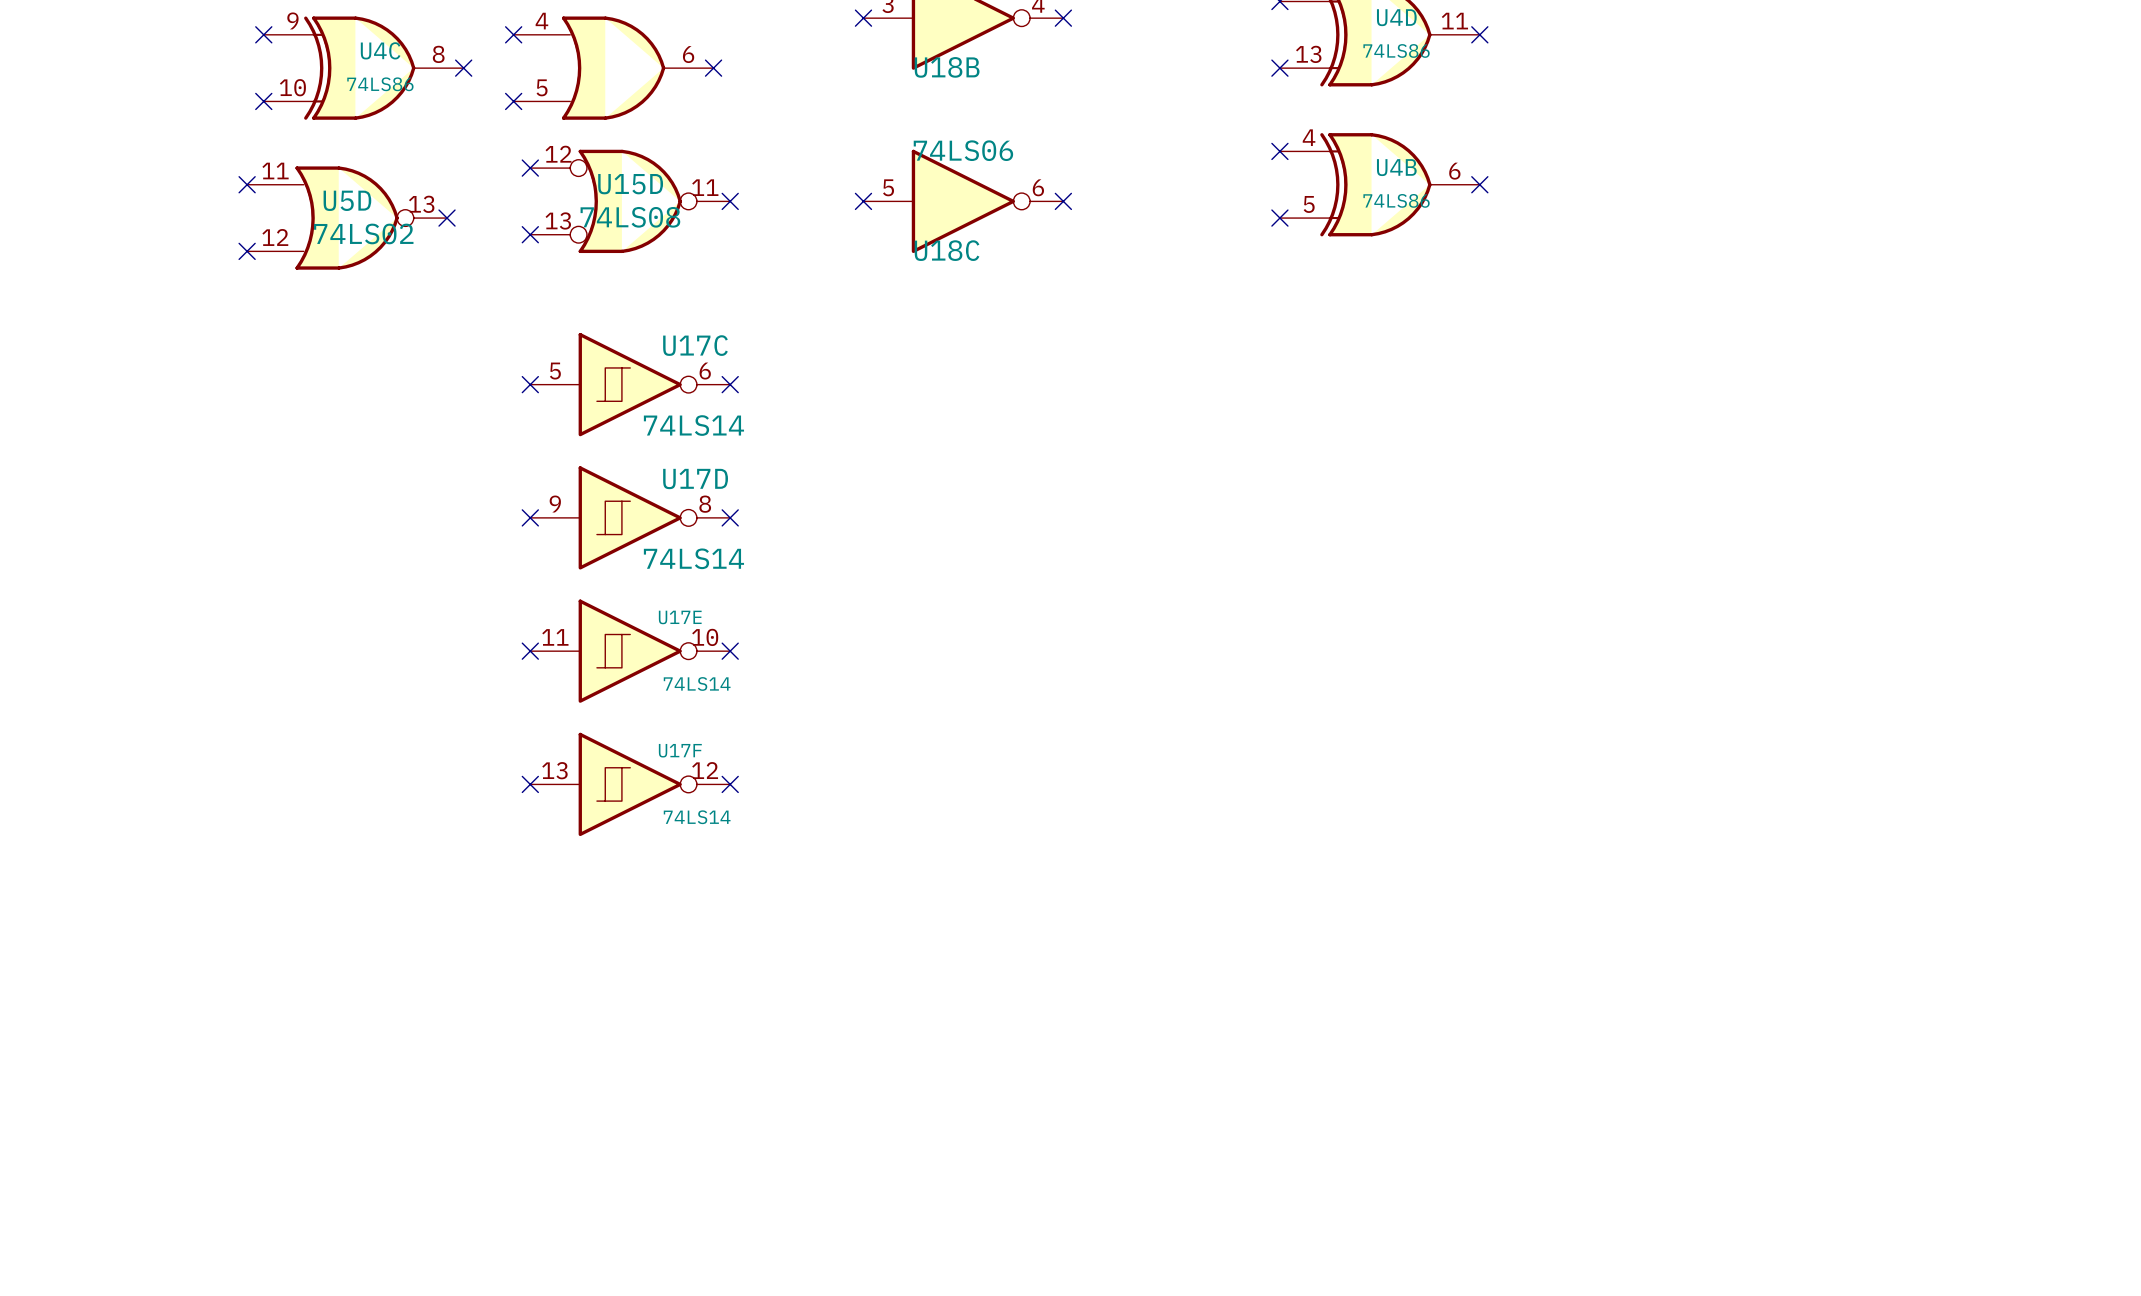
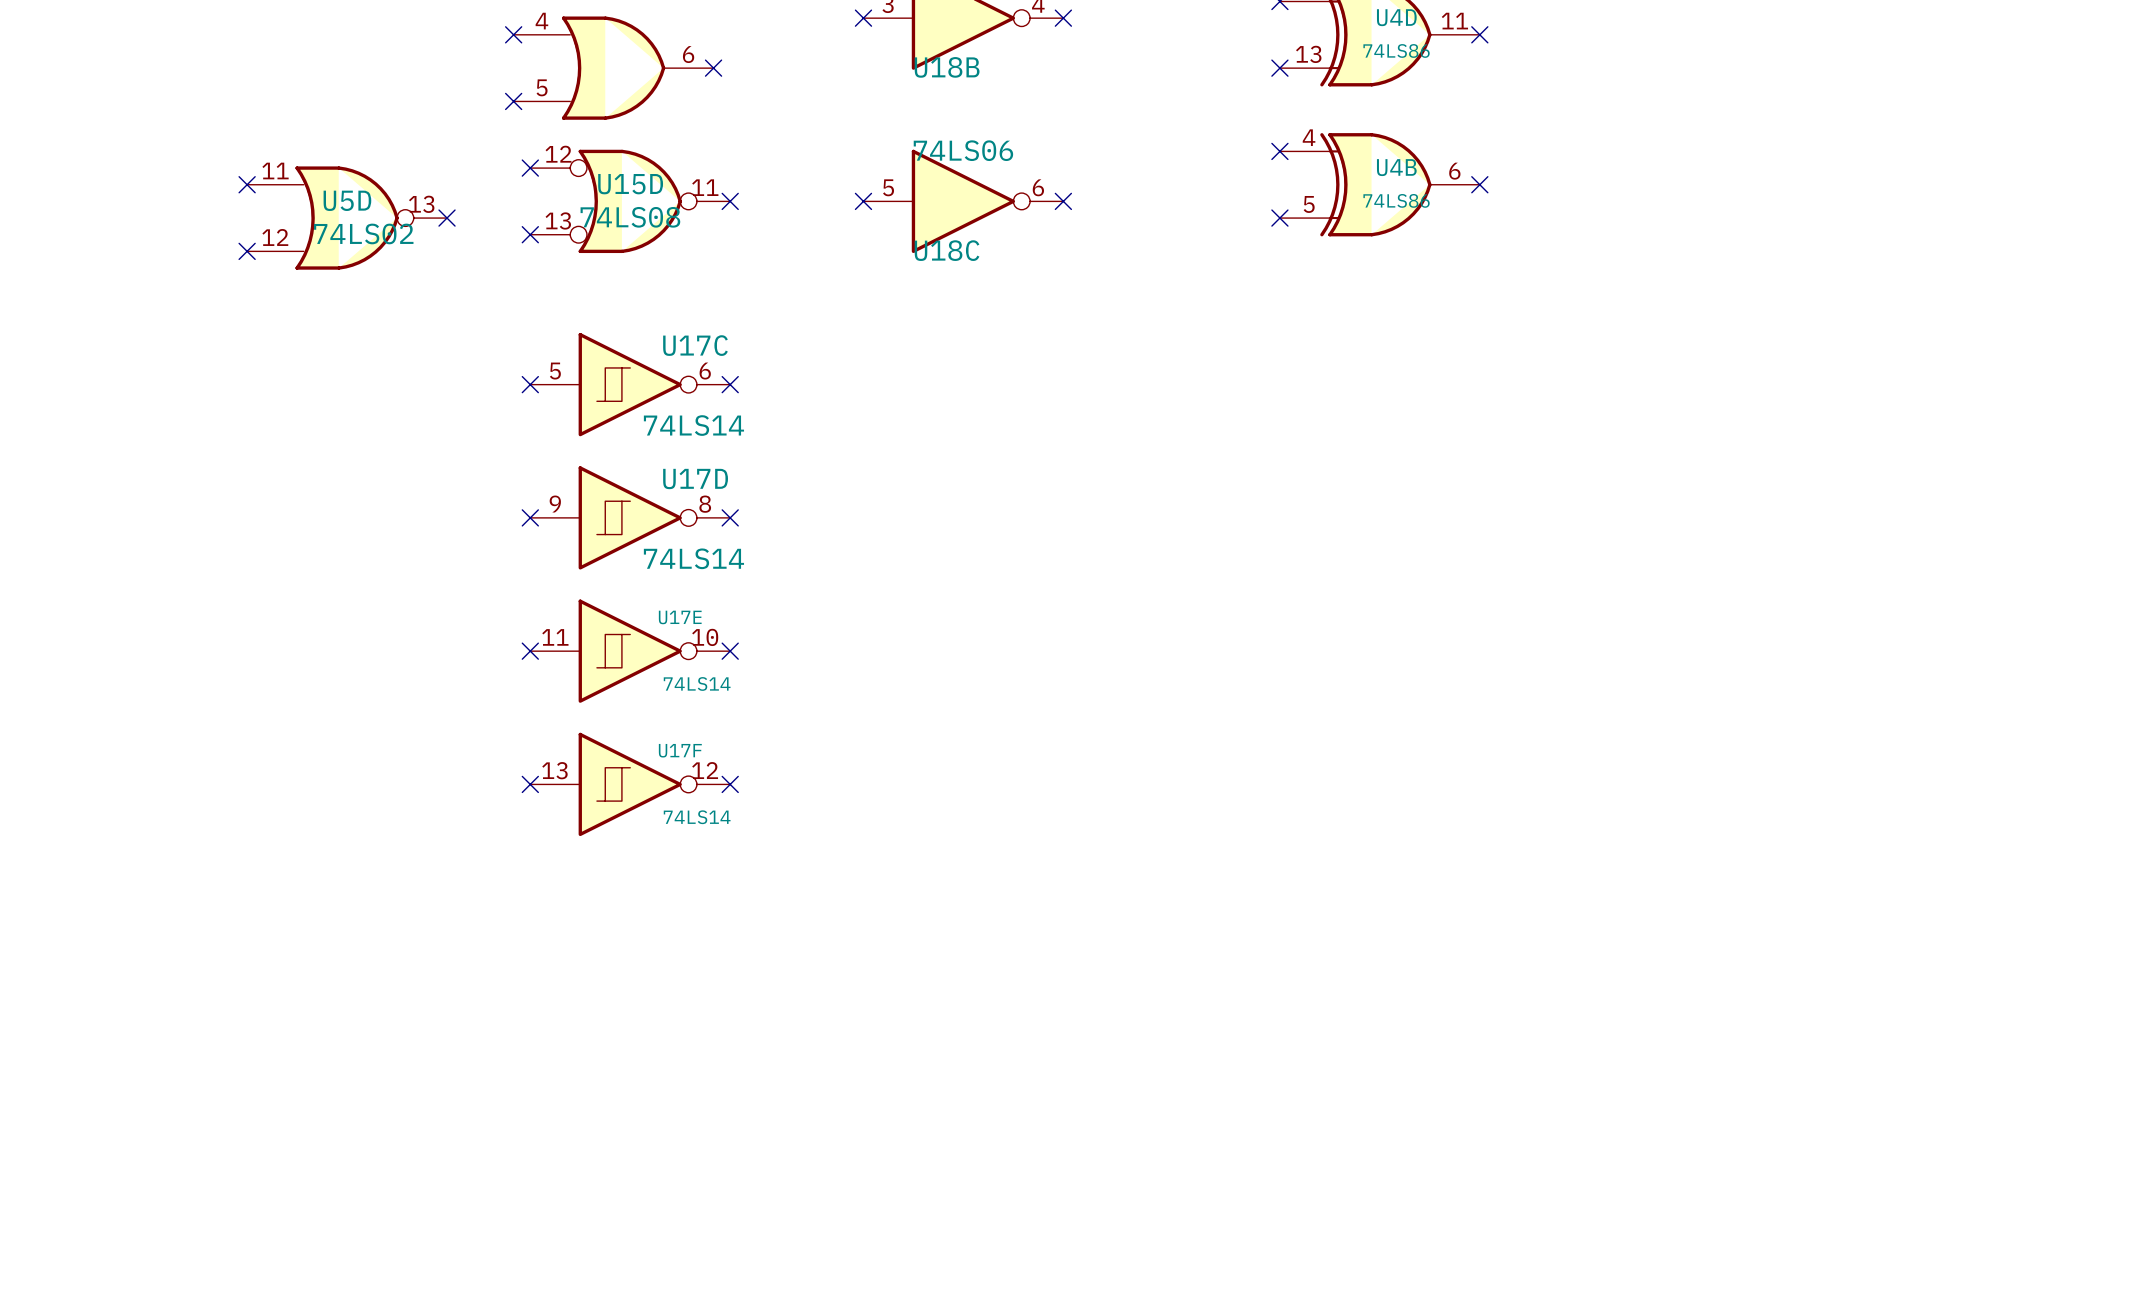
no-connect mark: (263, 34) -> none
U4C: 74LS86 (363, 68) -> none
no-connect mark: (463, 68) -> none
no-connect mark: (263, 101) -> none

